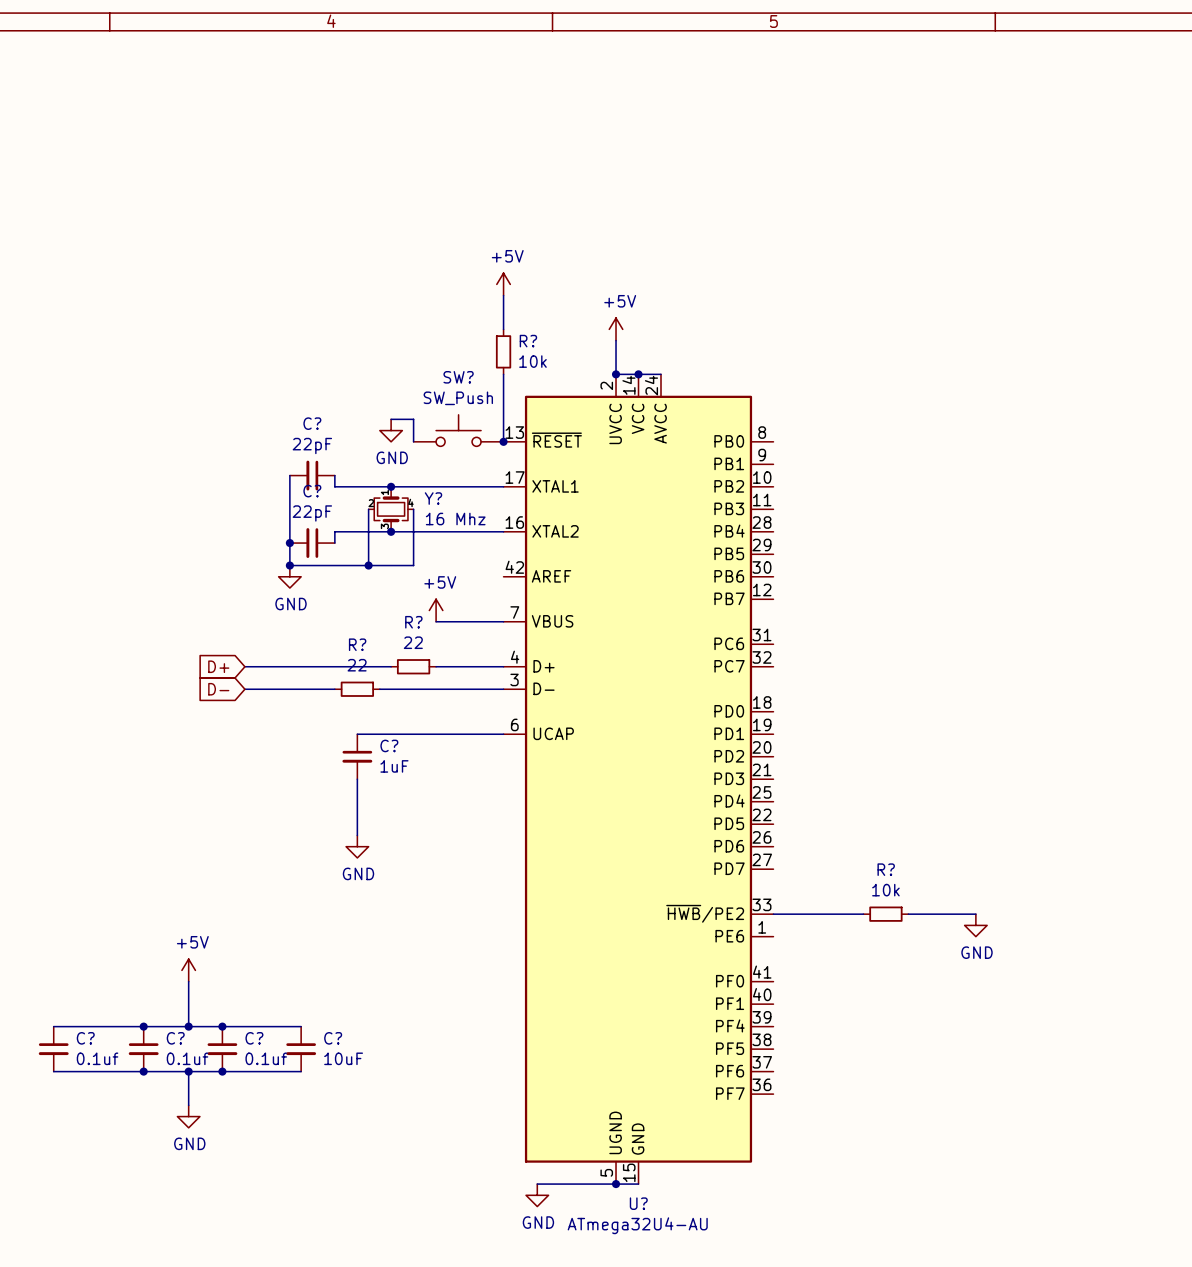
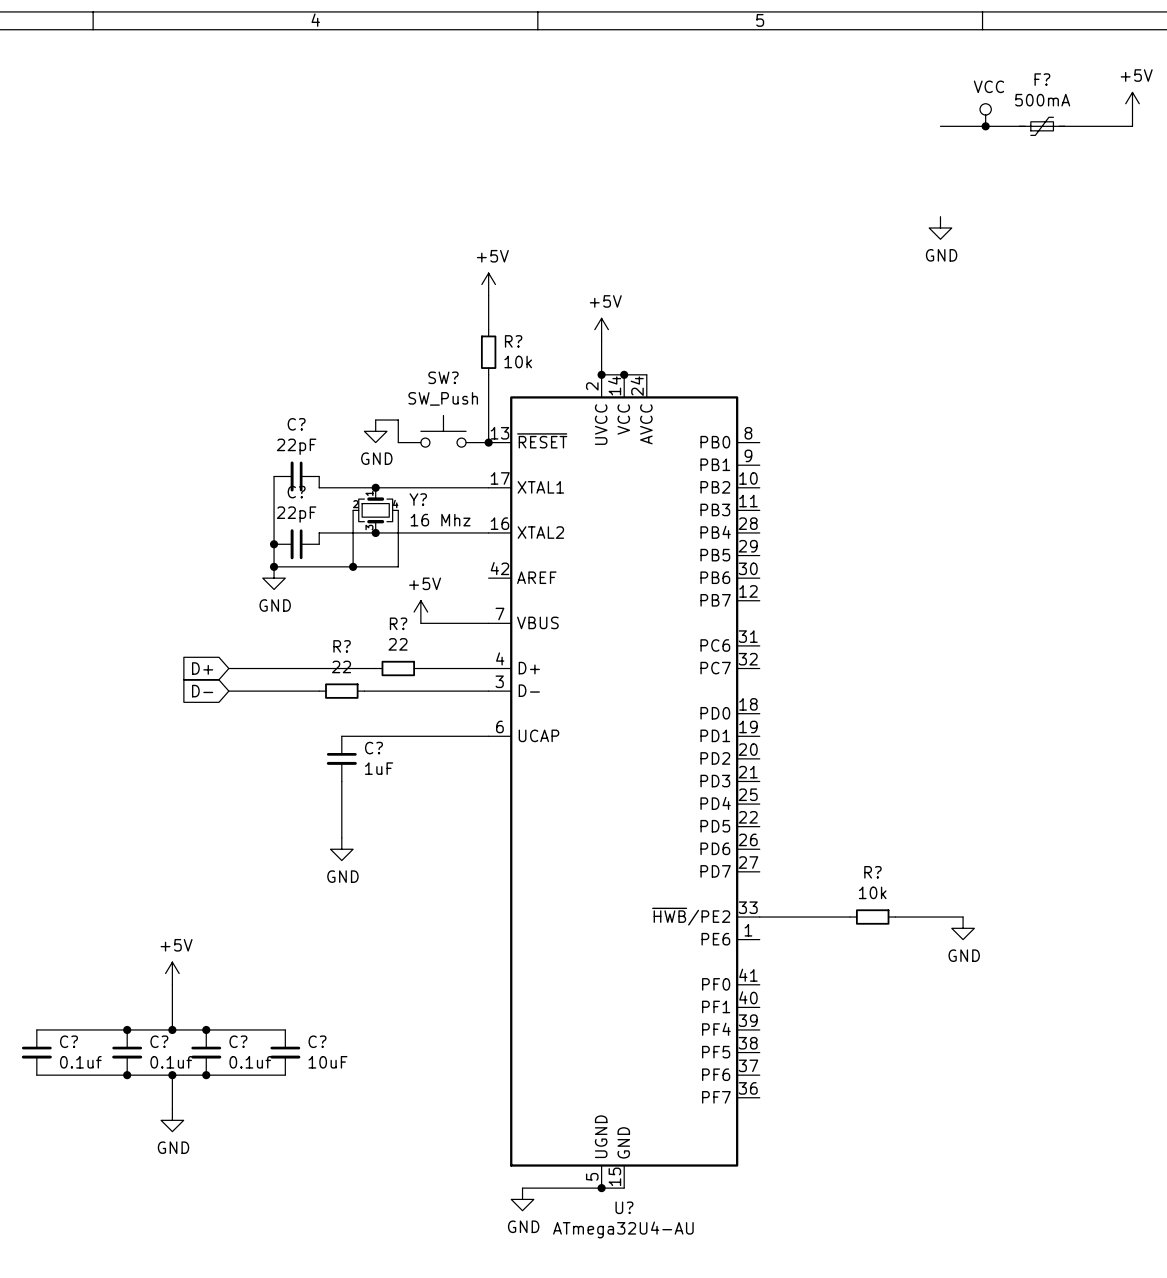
power symbol: none -> +5V (1132, 103)
power symbol: none -> VCC (985, 115)
wire: none -> (1132, 115) (1132, 126) (1064, 126)
wire: none -> (940, 126) (1019, 126)
junction: none -> (985, 126)
F?: none -> 500mA (1042, 126)
power symbol: none -> GND (940, 227)

